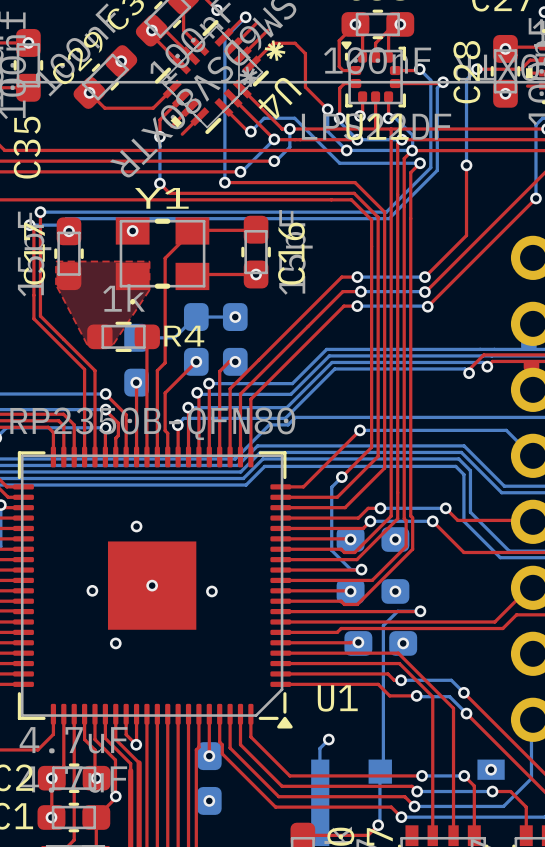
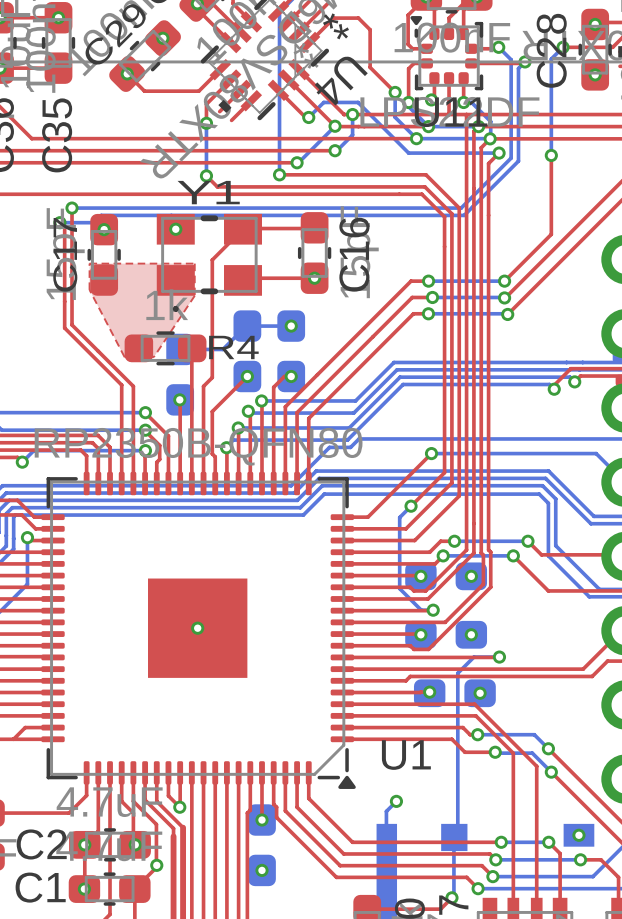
via: (136, 526) -> none
via: (92, 590) -> none
via: (211, 591) -> none
via: (115, 643) -> none

